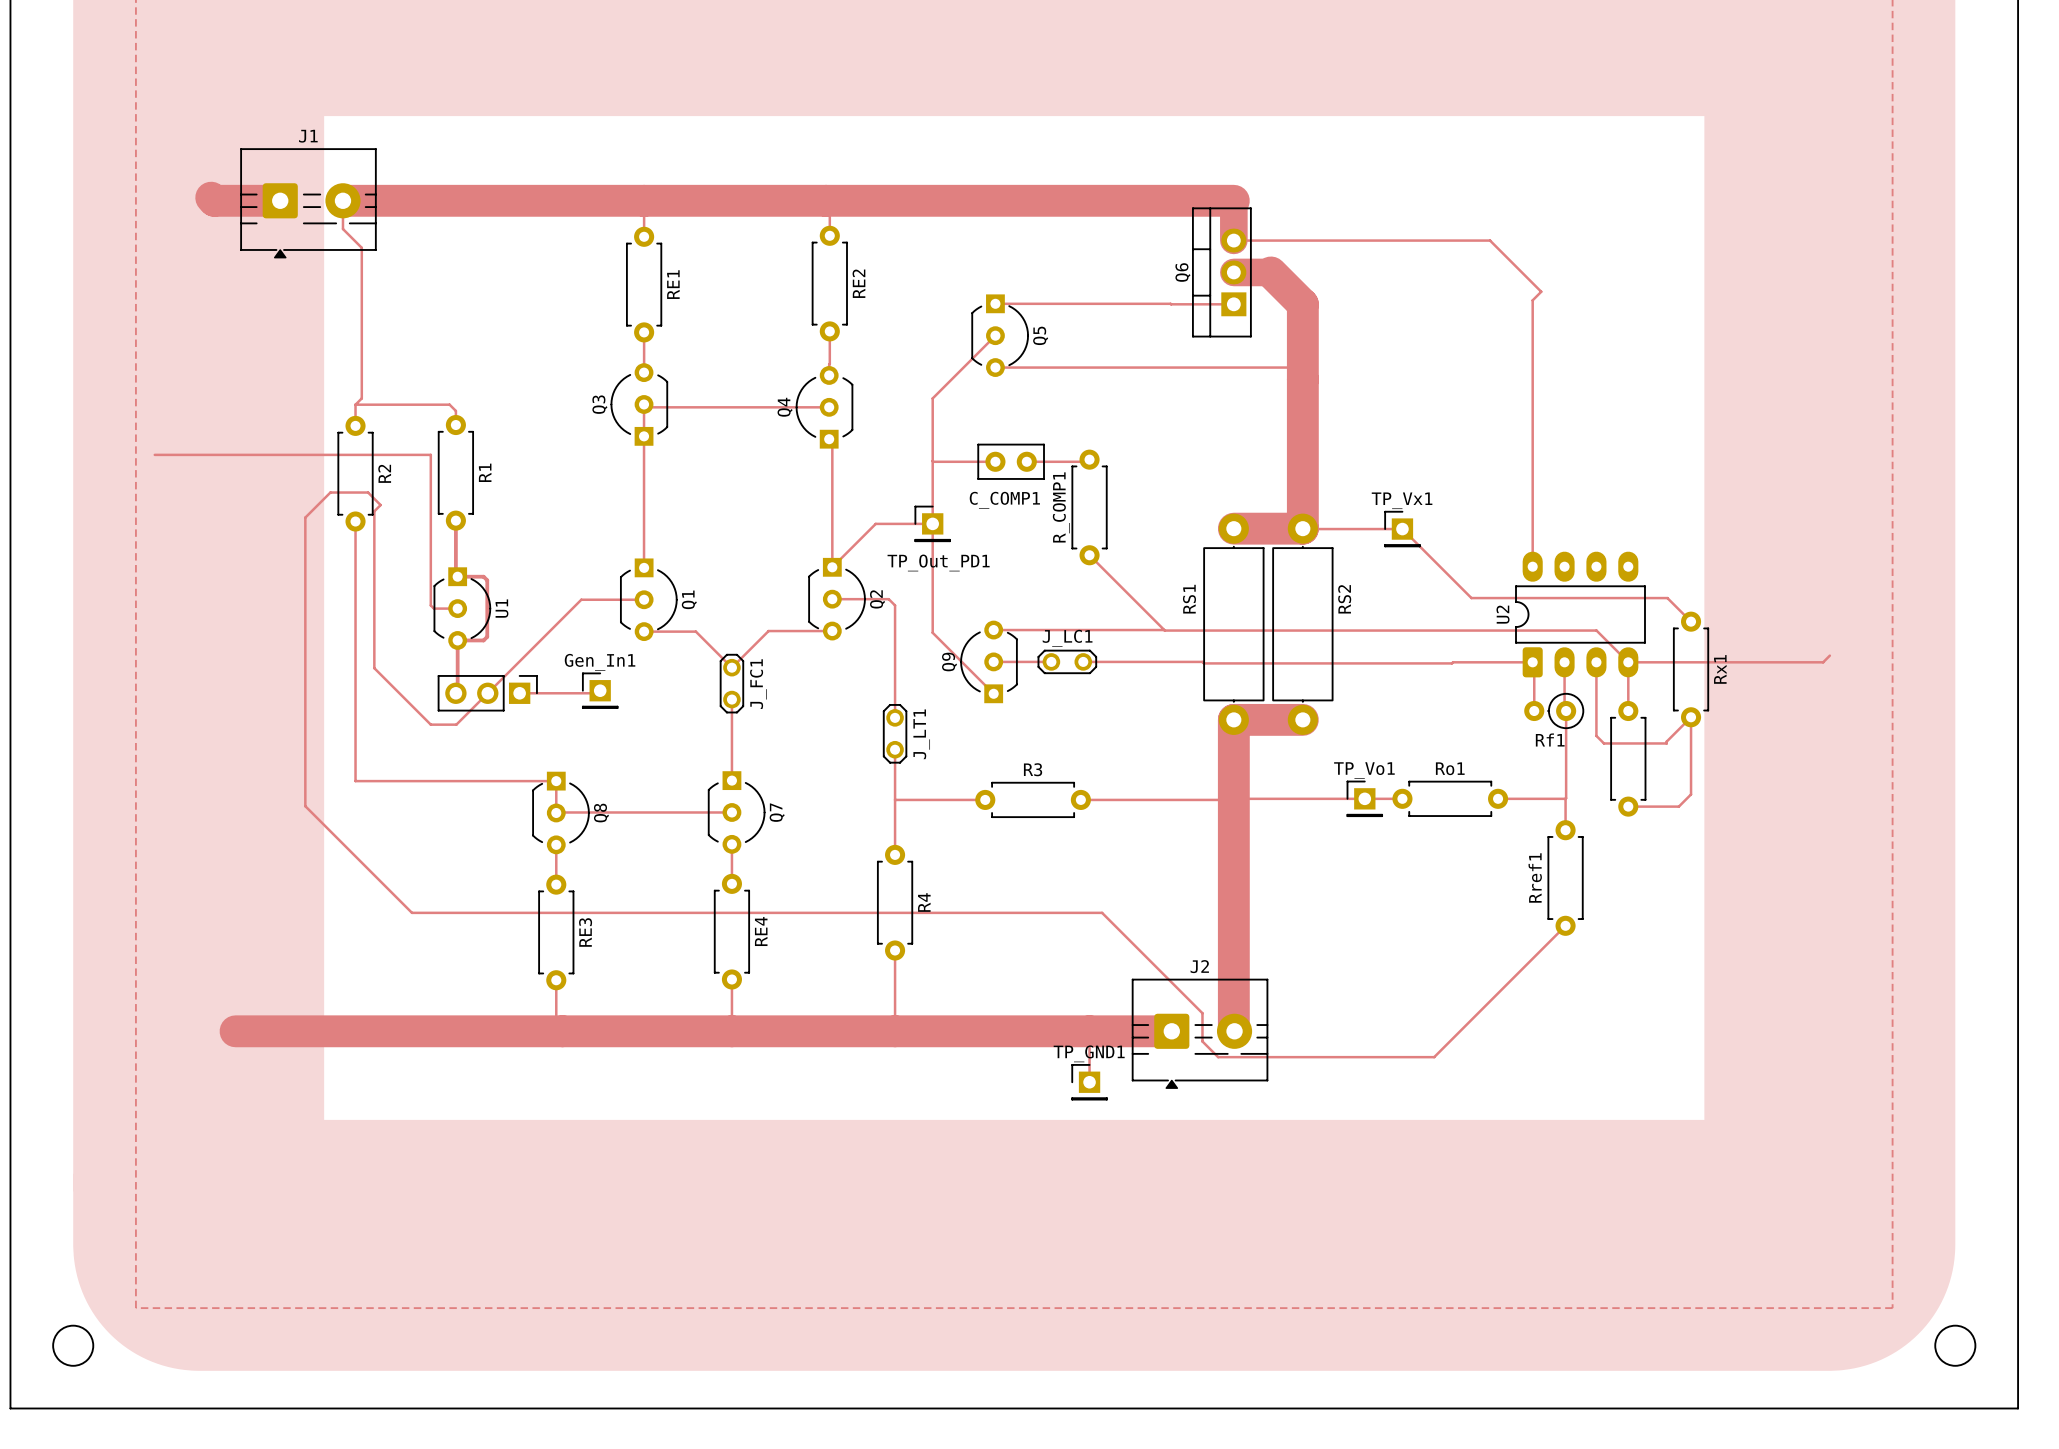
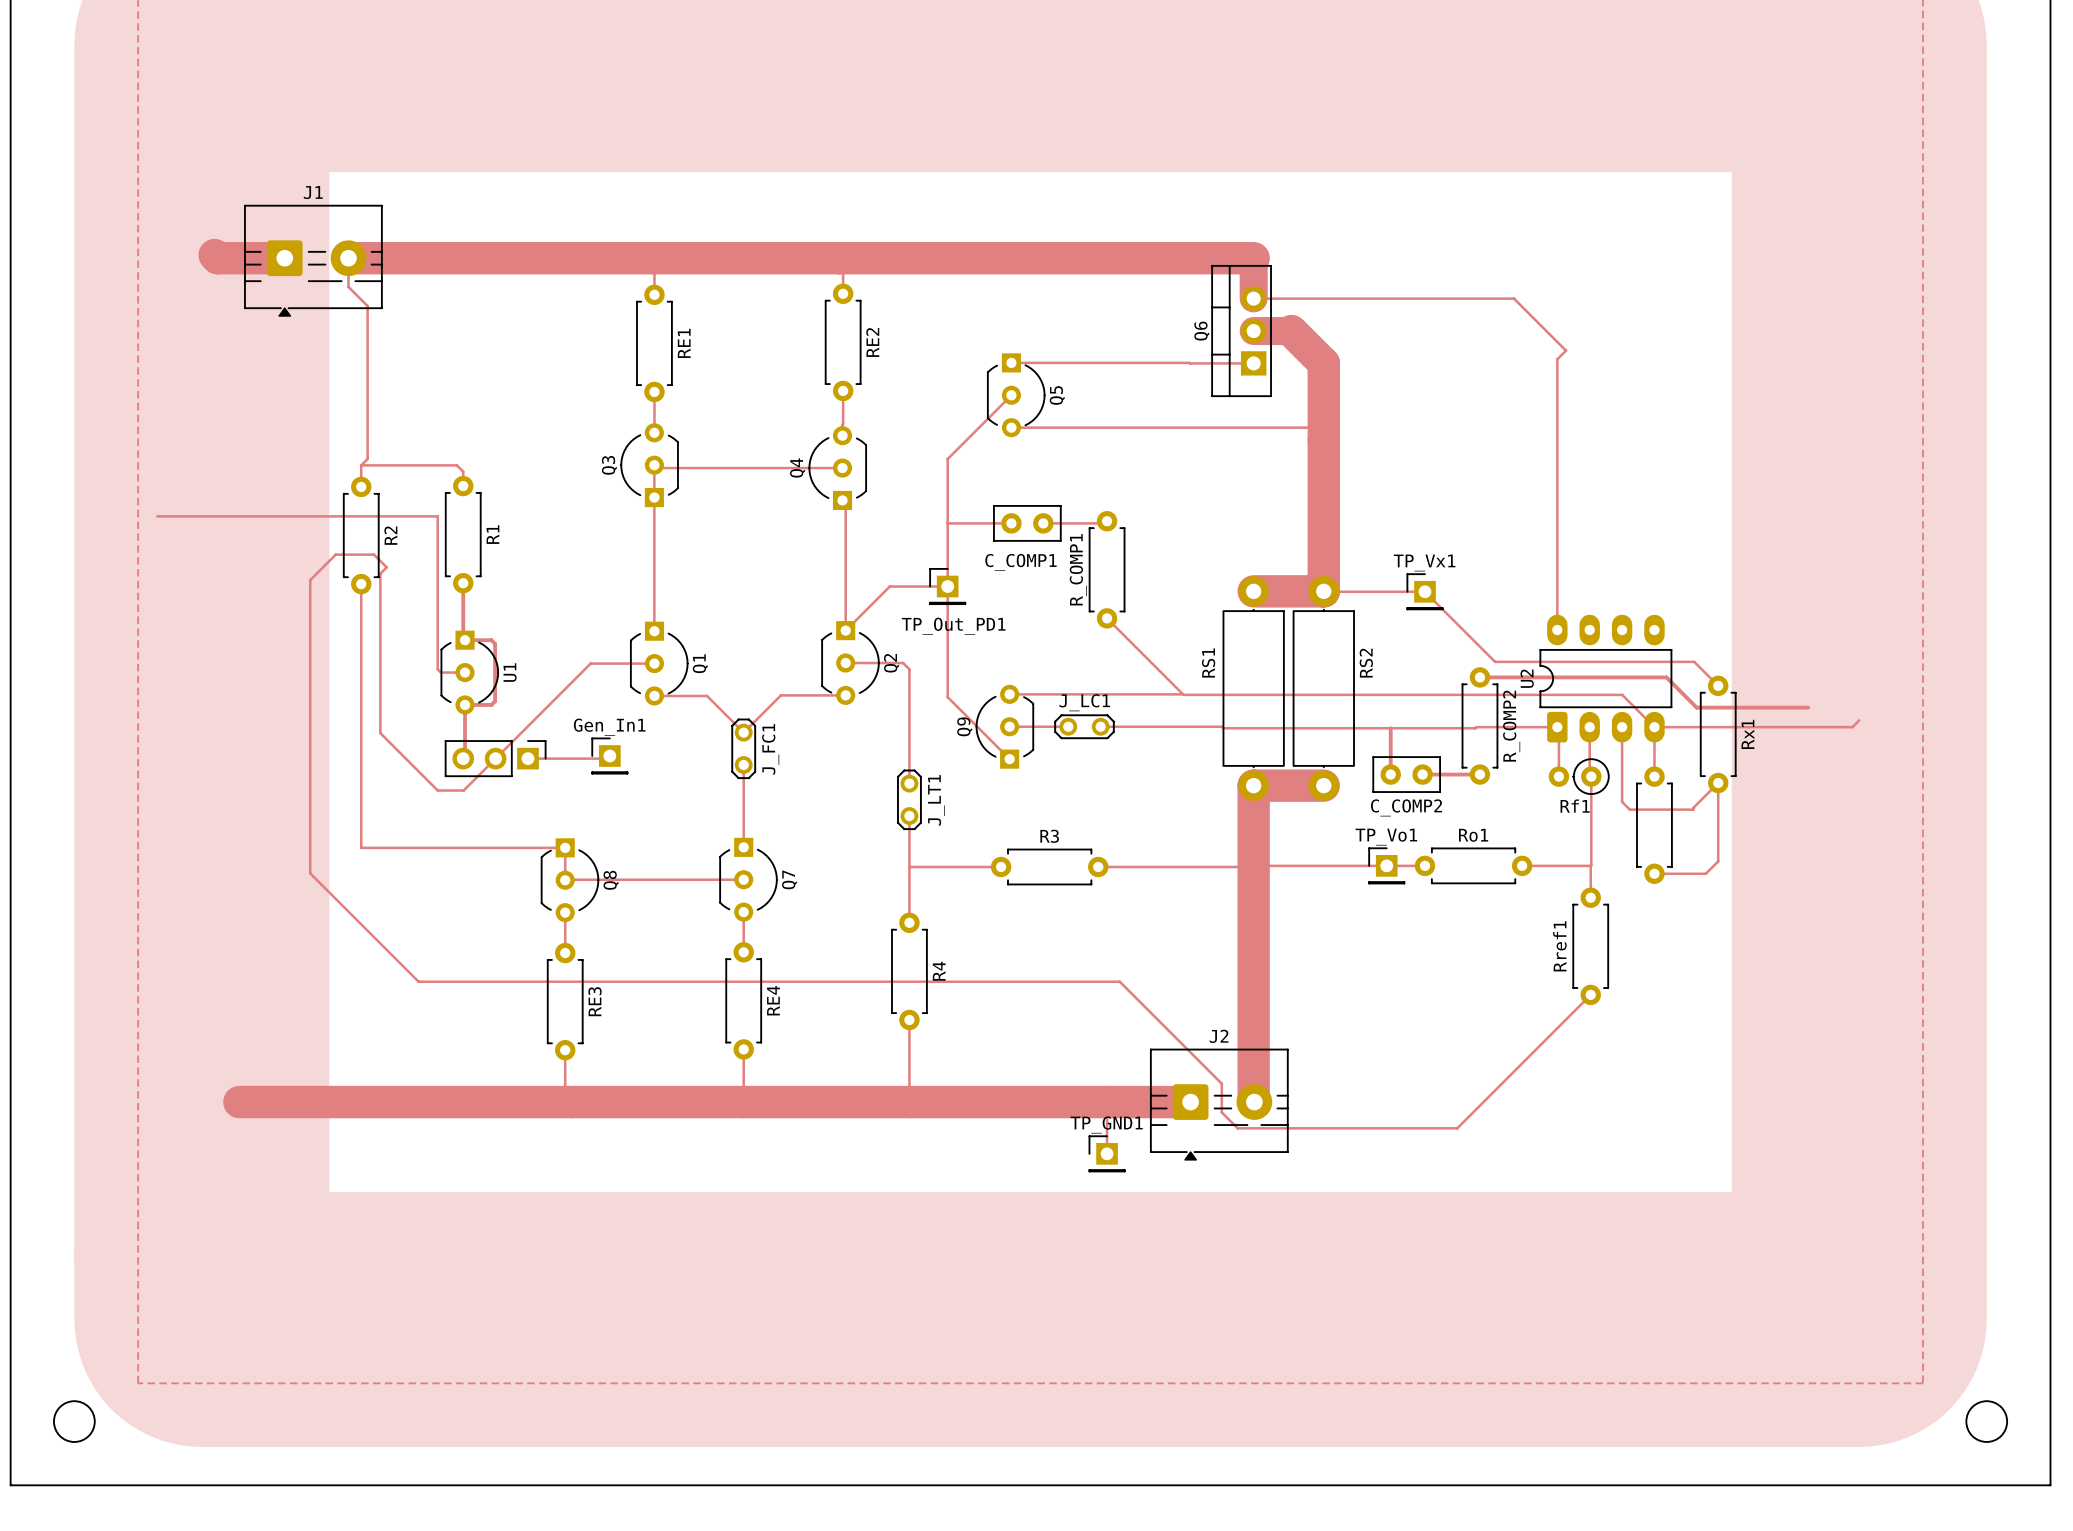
top track: none -> (1479, 677) (1666, 677) (1696, 707) (1808, 707)
R_COMP2: none -> (1479, 725)
top track: none -> (1390, 728) (1390, 774)
C_COMP2: none -> (1406, 774)
top track: none -> (1422, 774) (1479, 774)

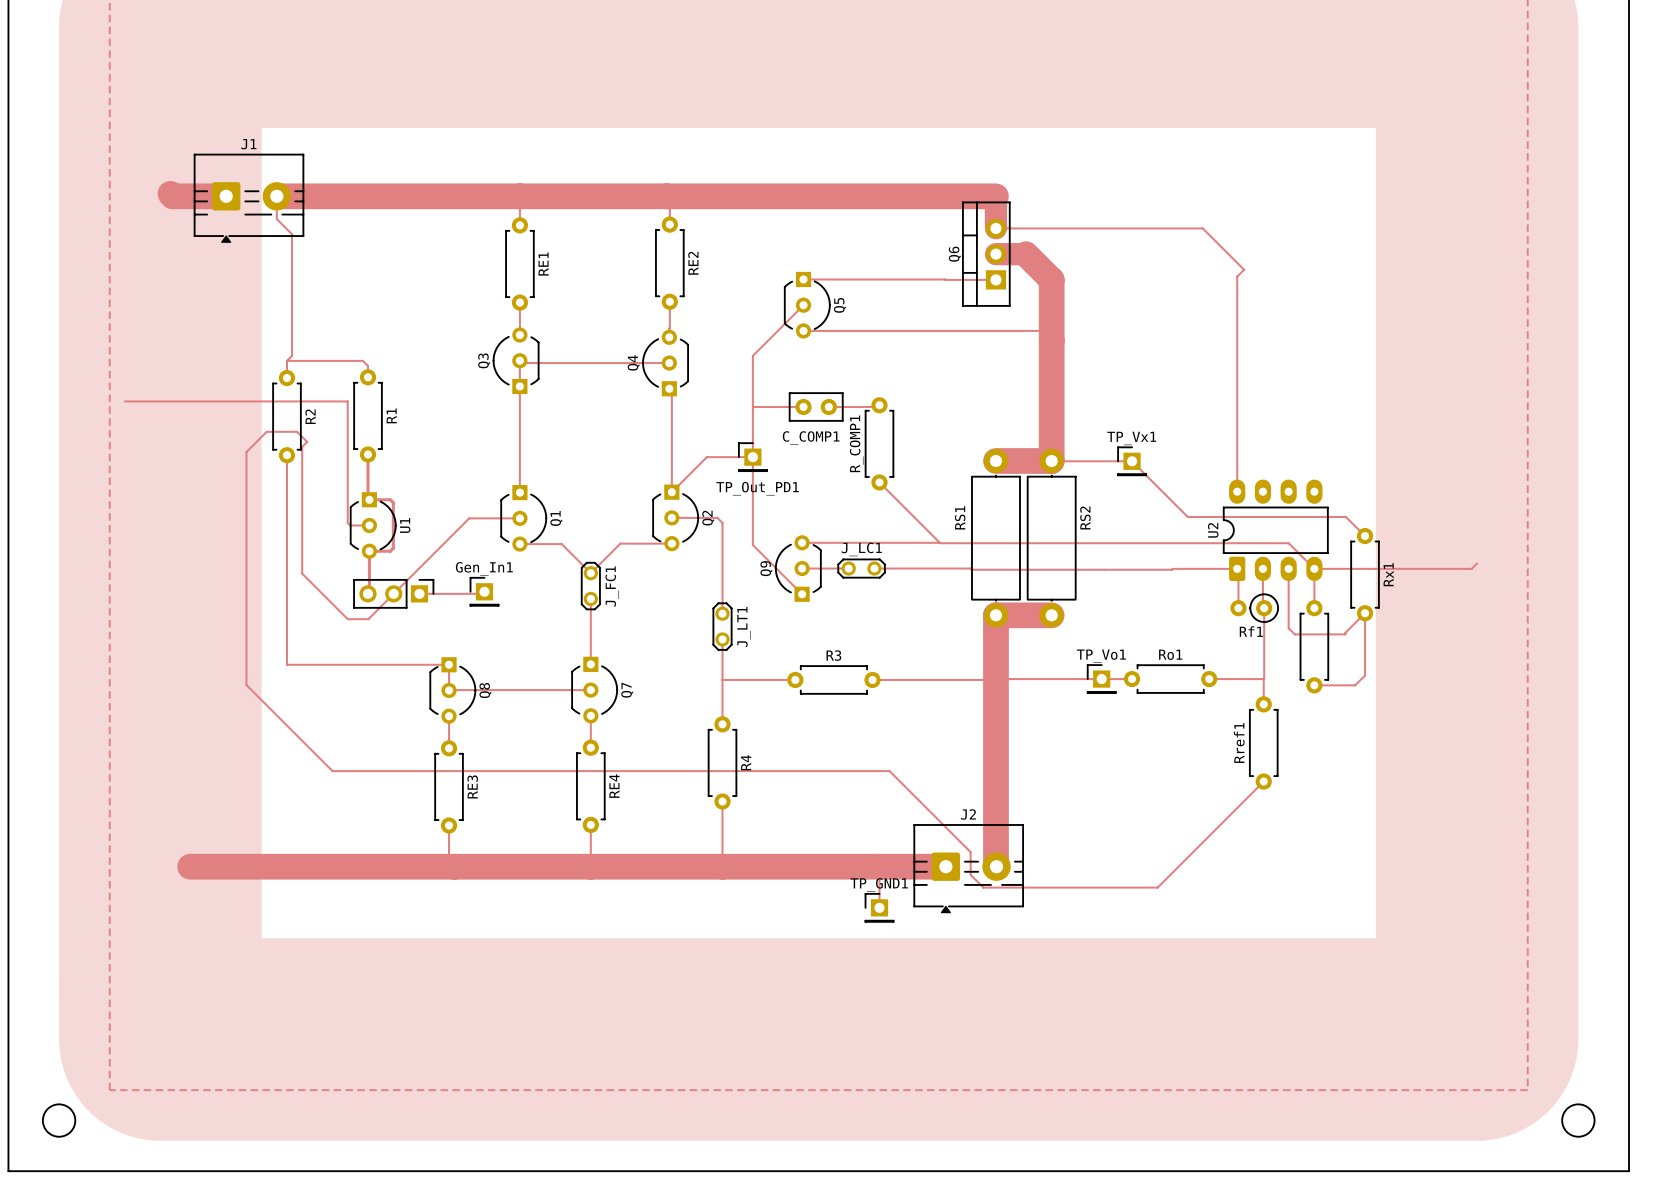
top track: (1479, 677) (1666, 677) (1696, 707) (1808, 707) -> none
R_COMP2: (1479, 725) -> none
top track: (1390, 728) (1390, 774) -> none
C_COMP2: (1406, 774) -> none
top track: (1422, 774) (1479, 774) -> none

